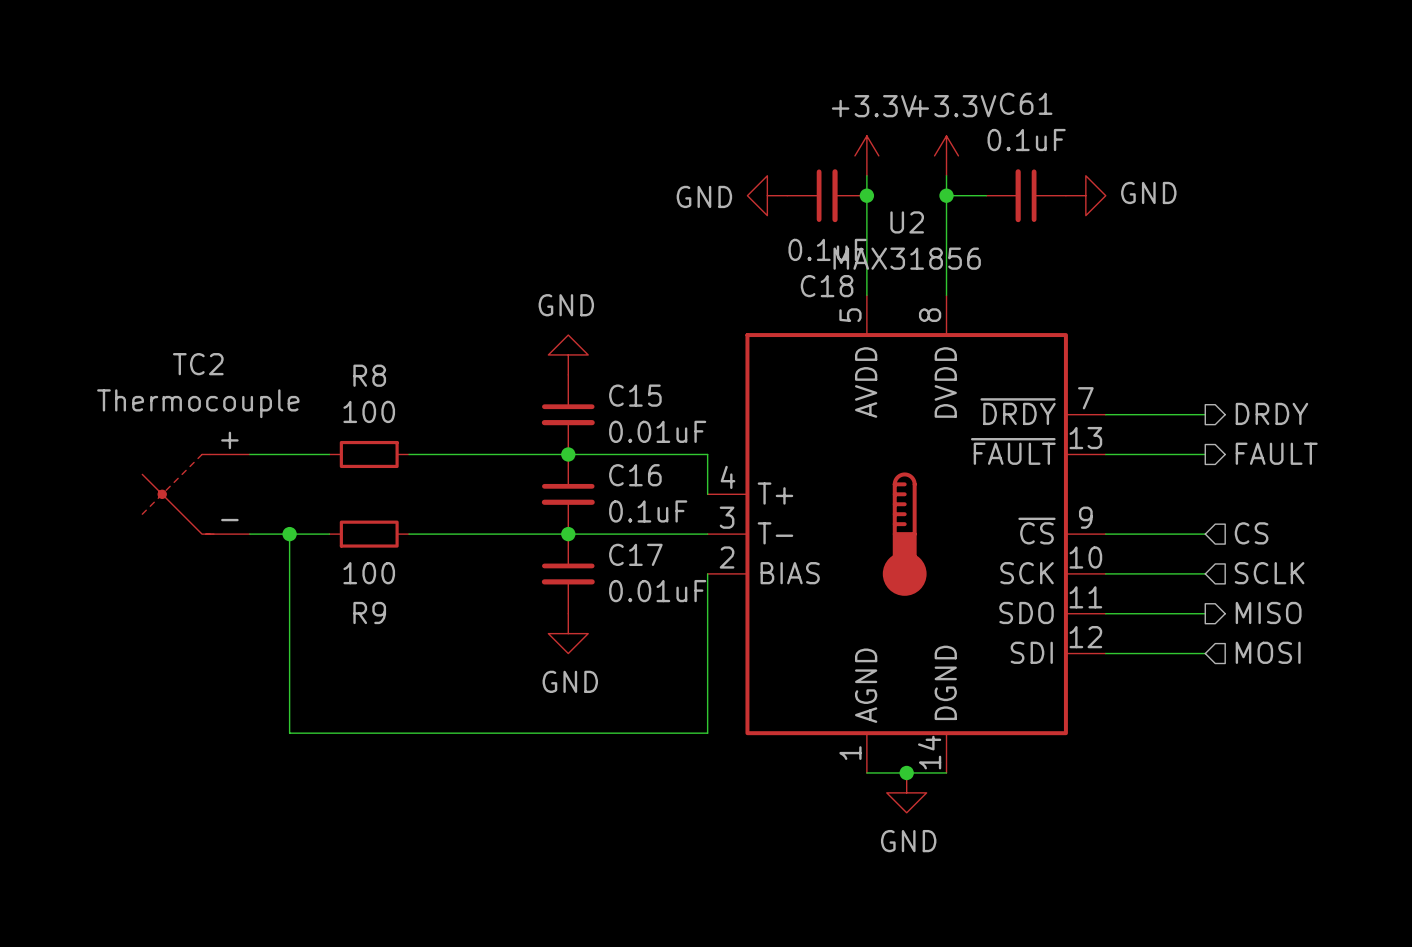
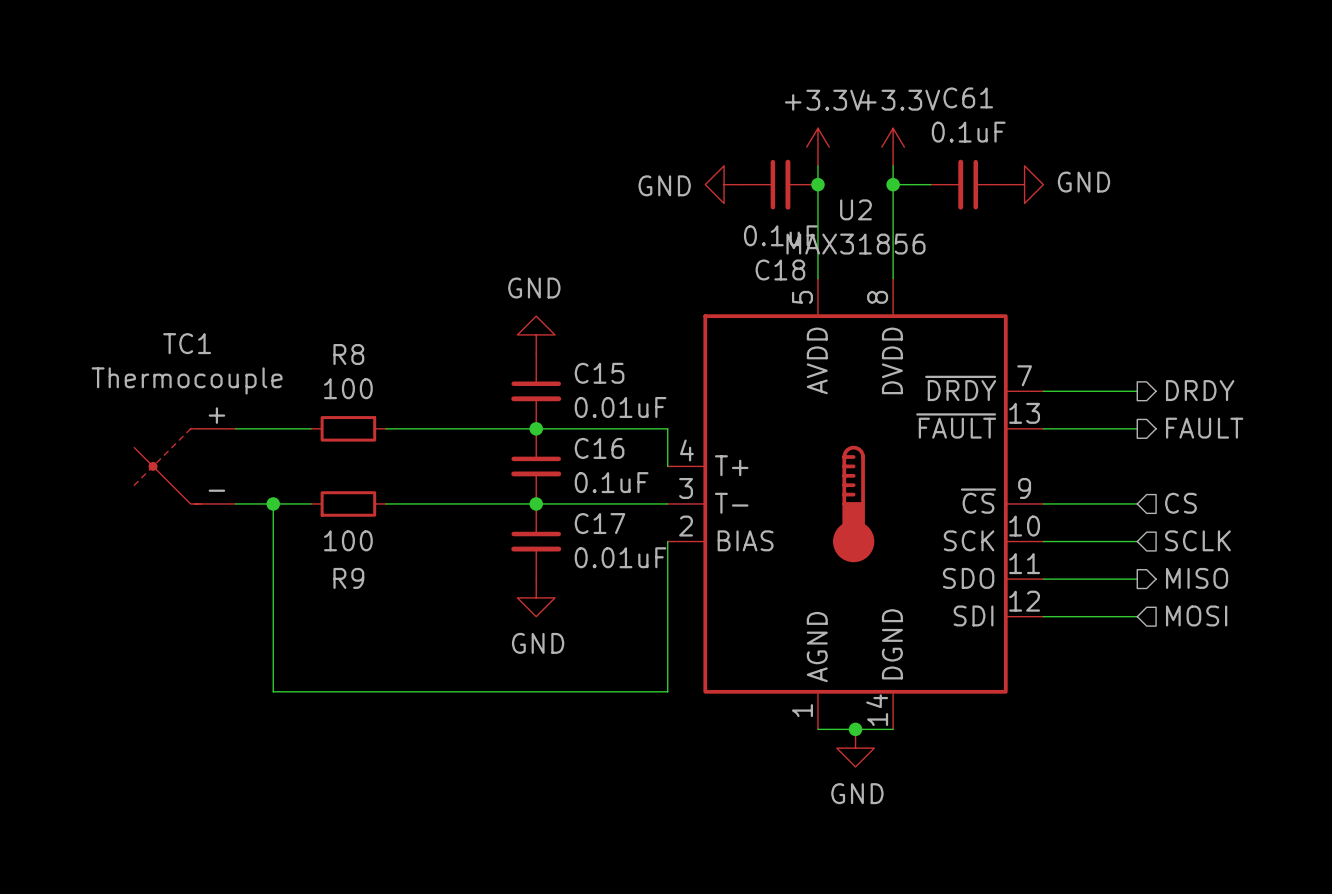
TC2 name: TC2 (198, 364) -> TC1 (187, 343)

